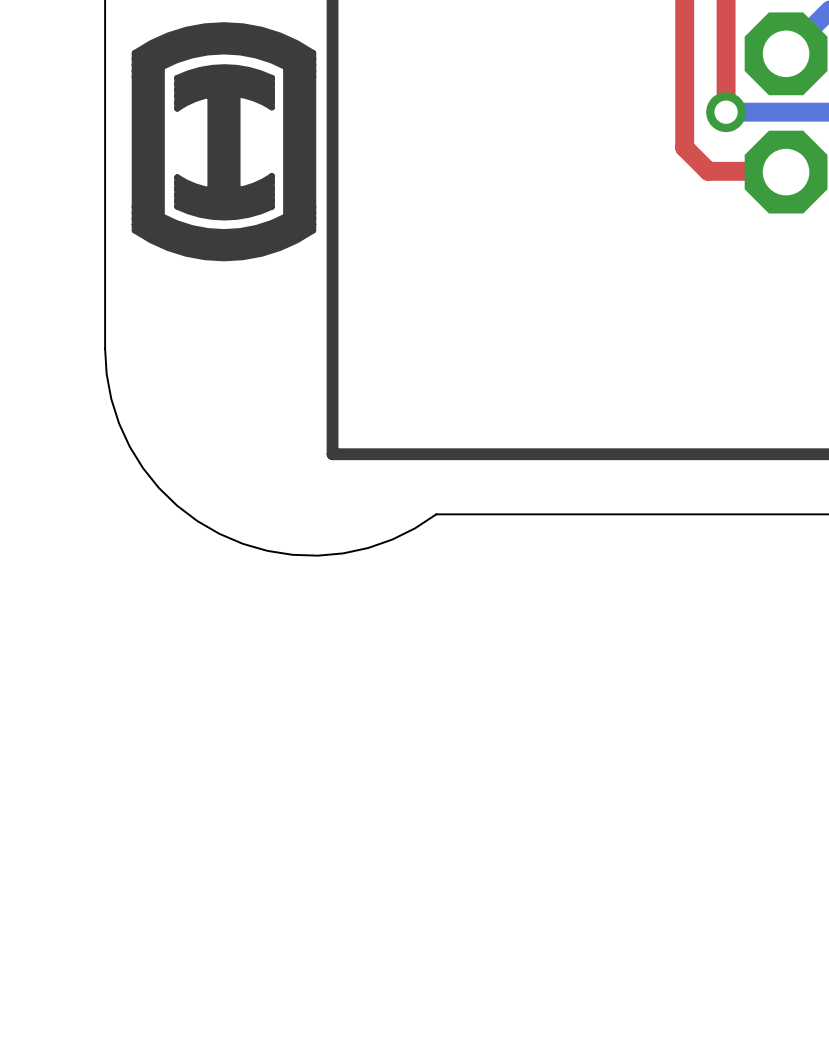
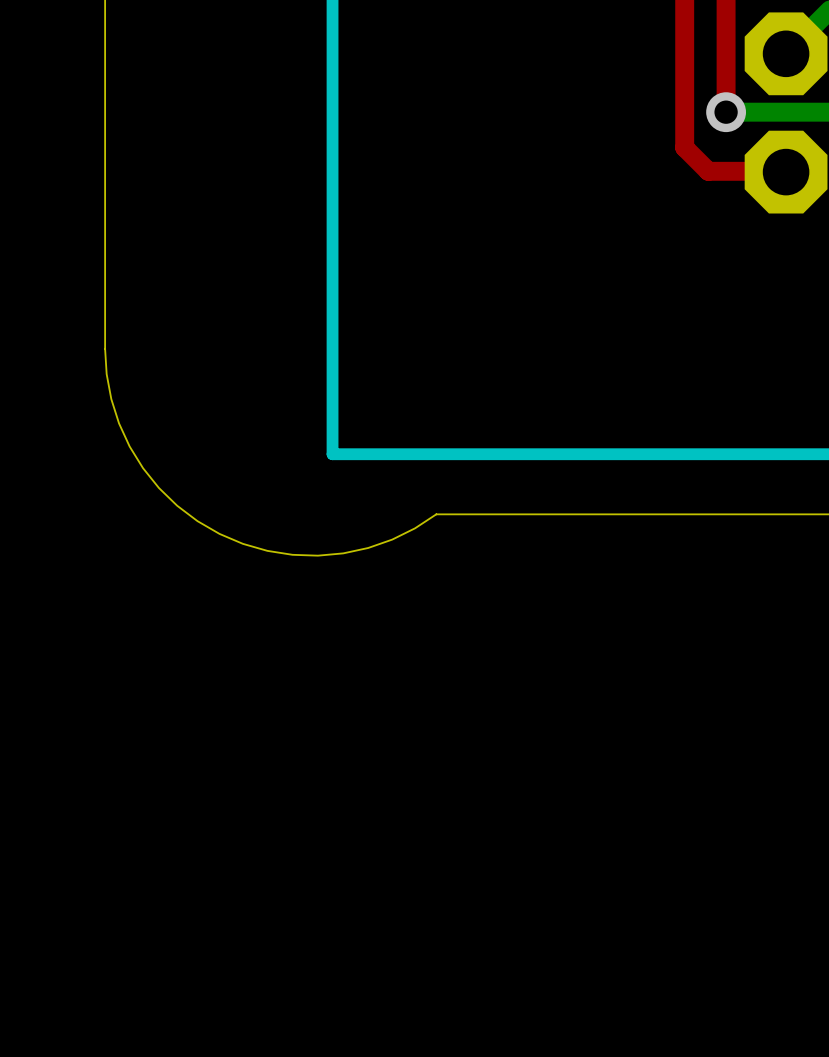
drawing: [131, 22, 317, 262] -> none

